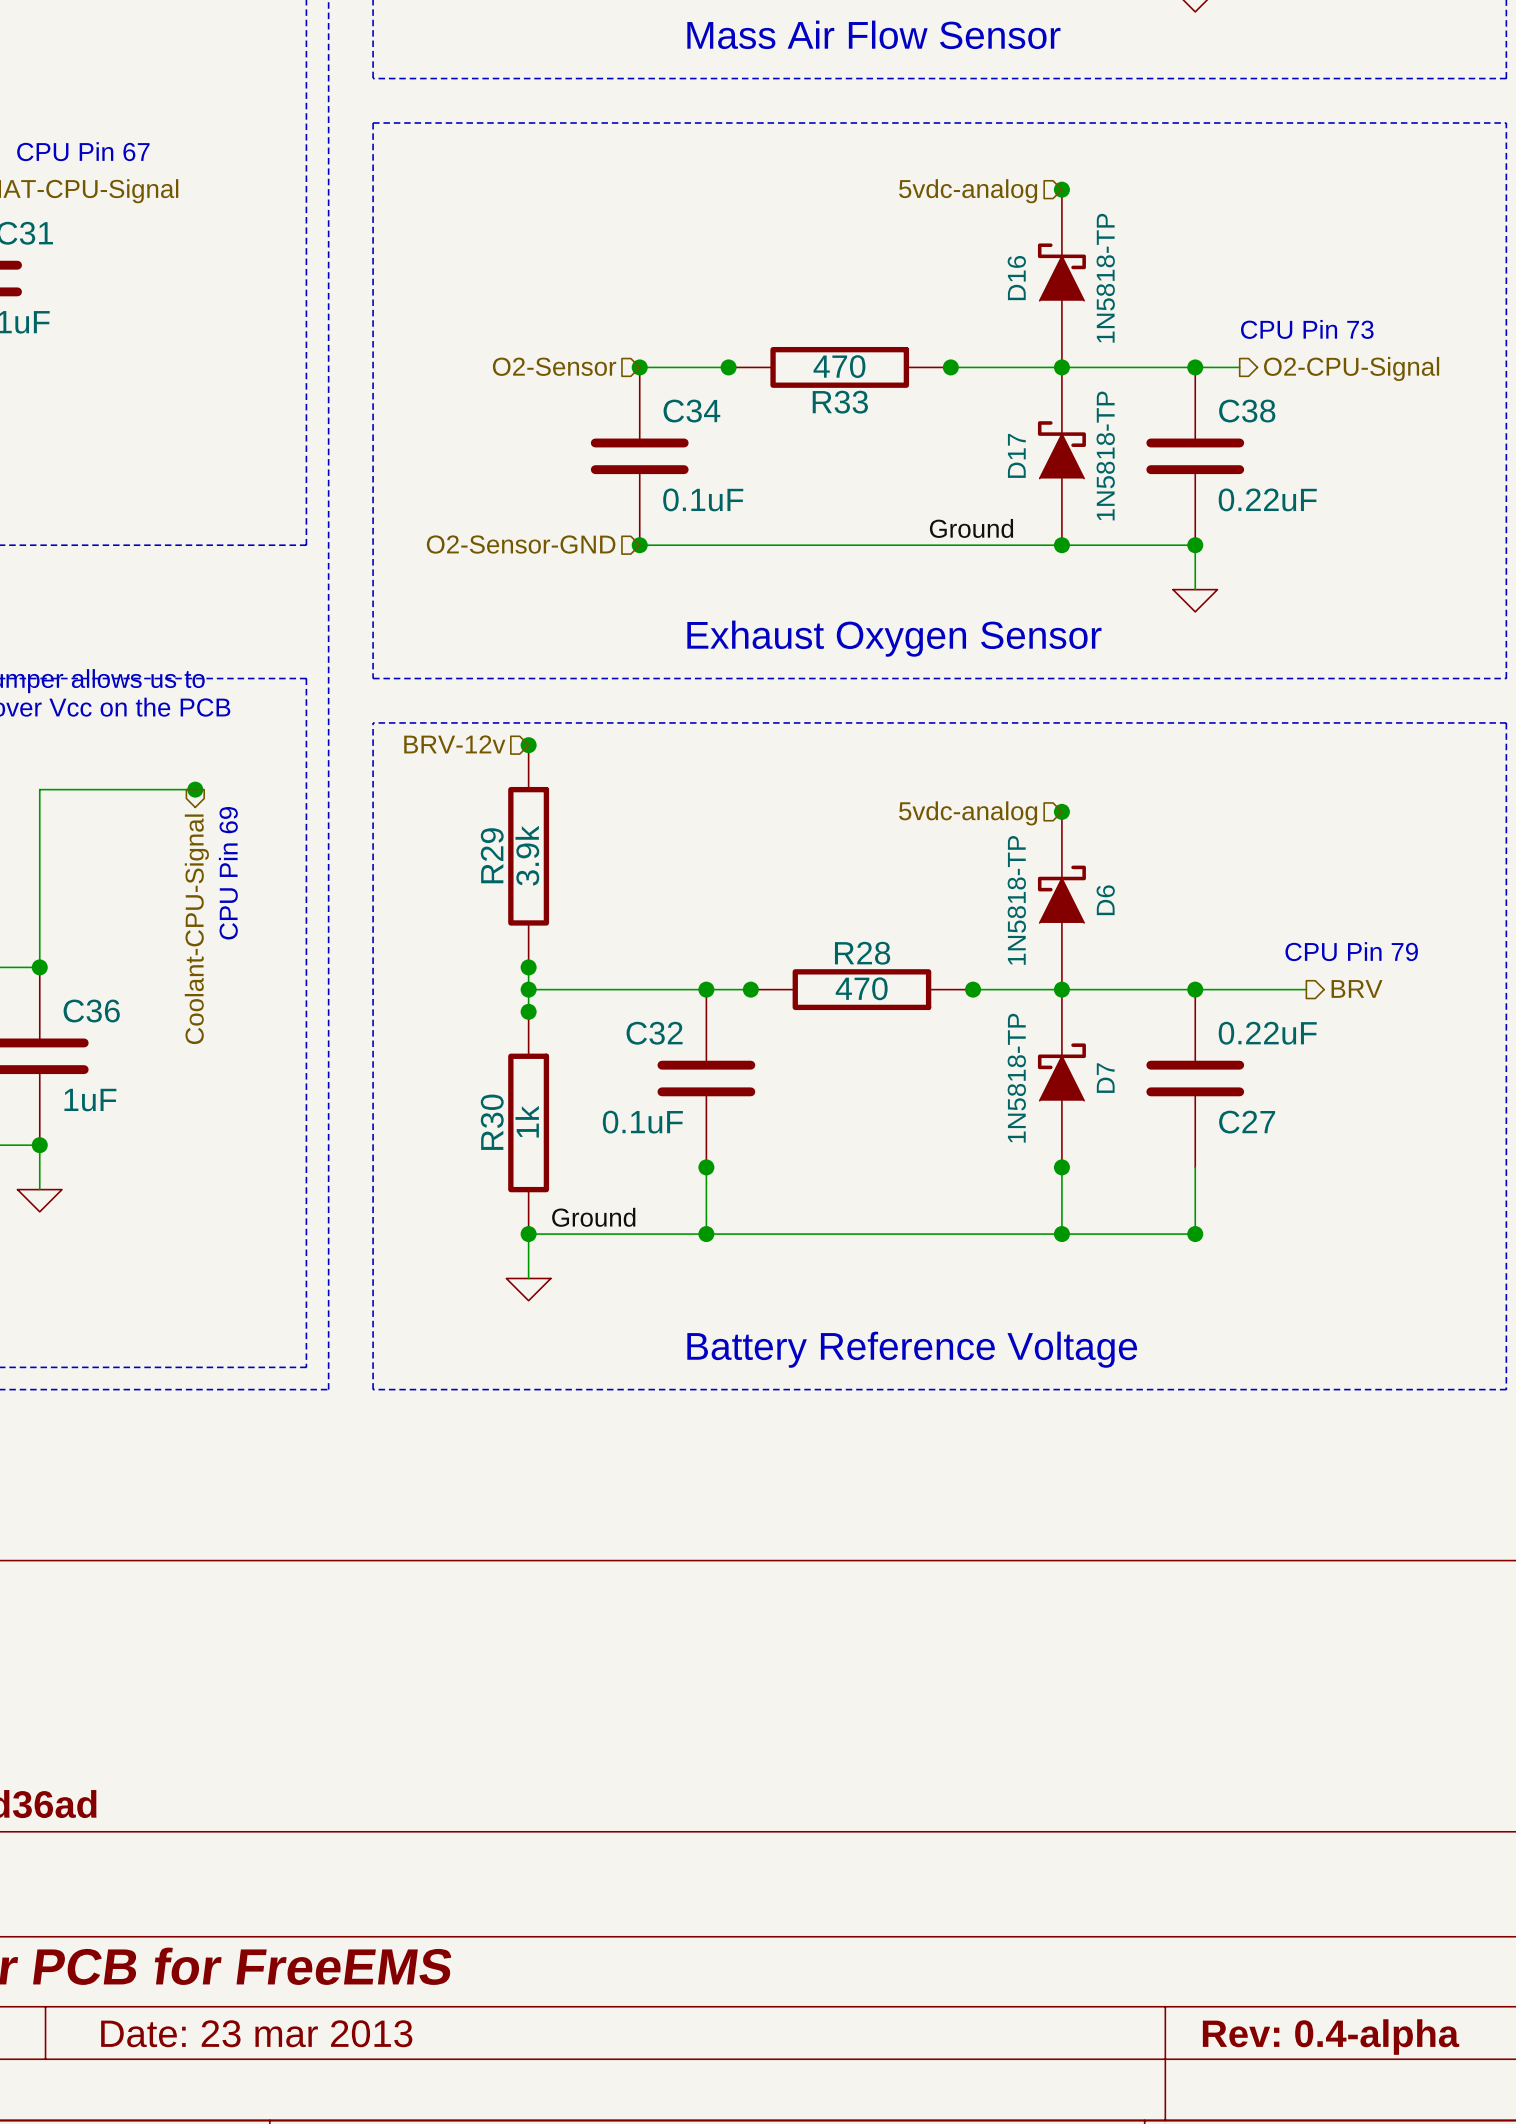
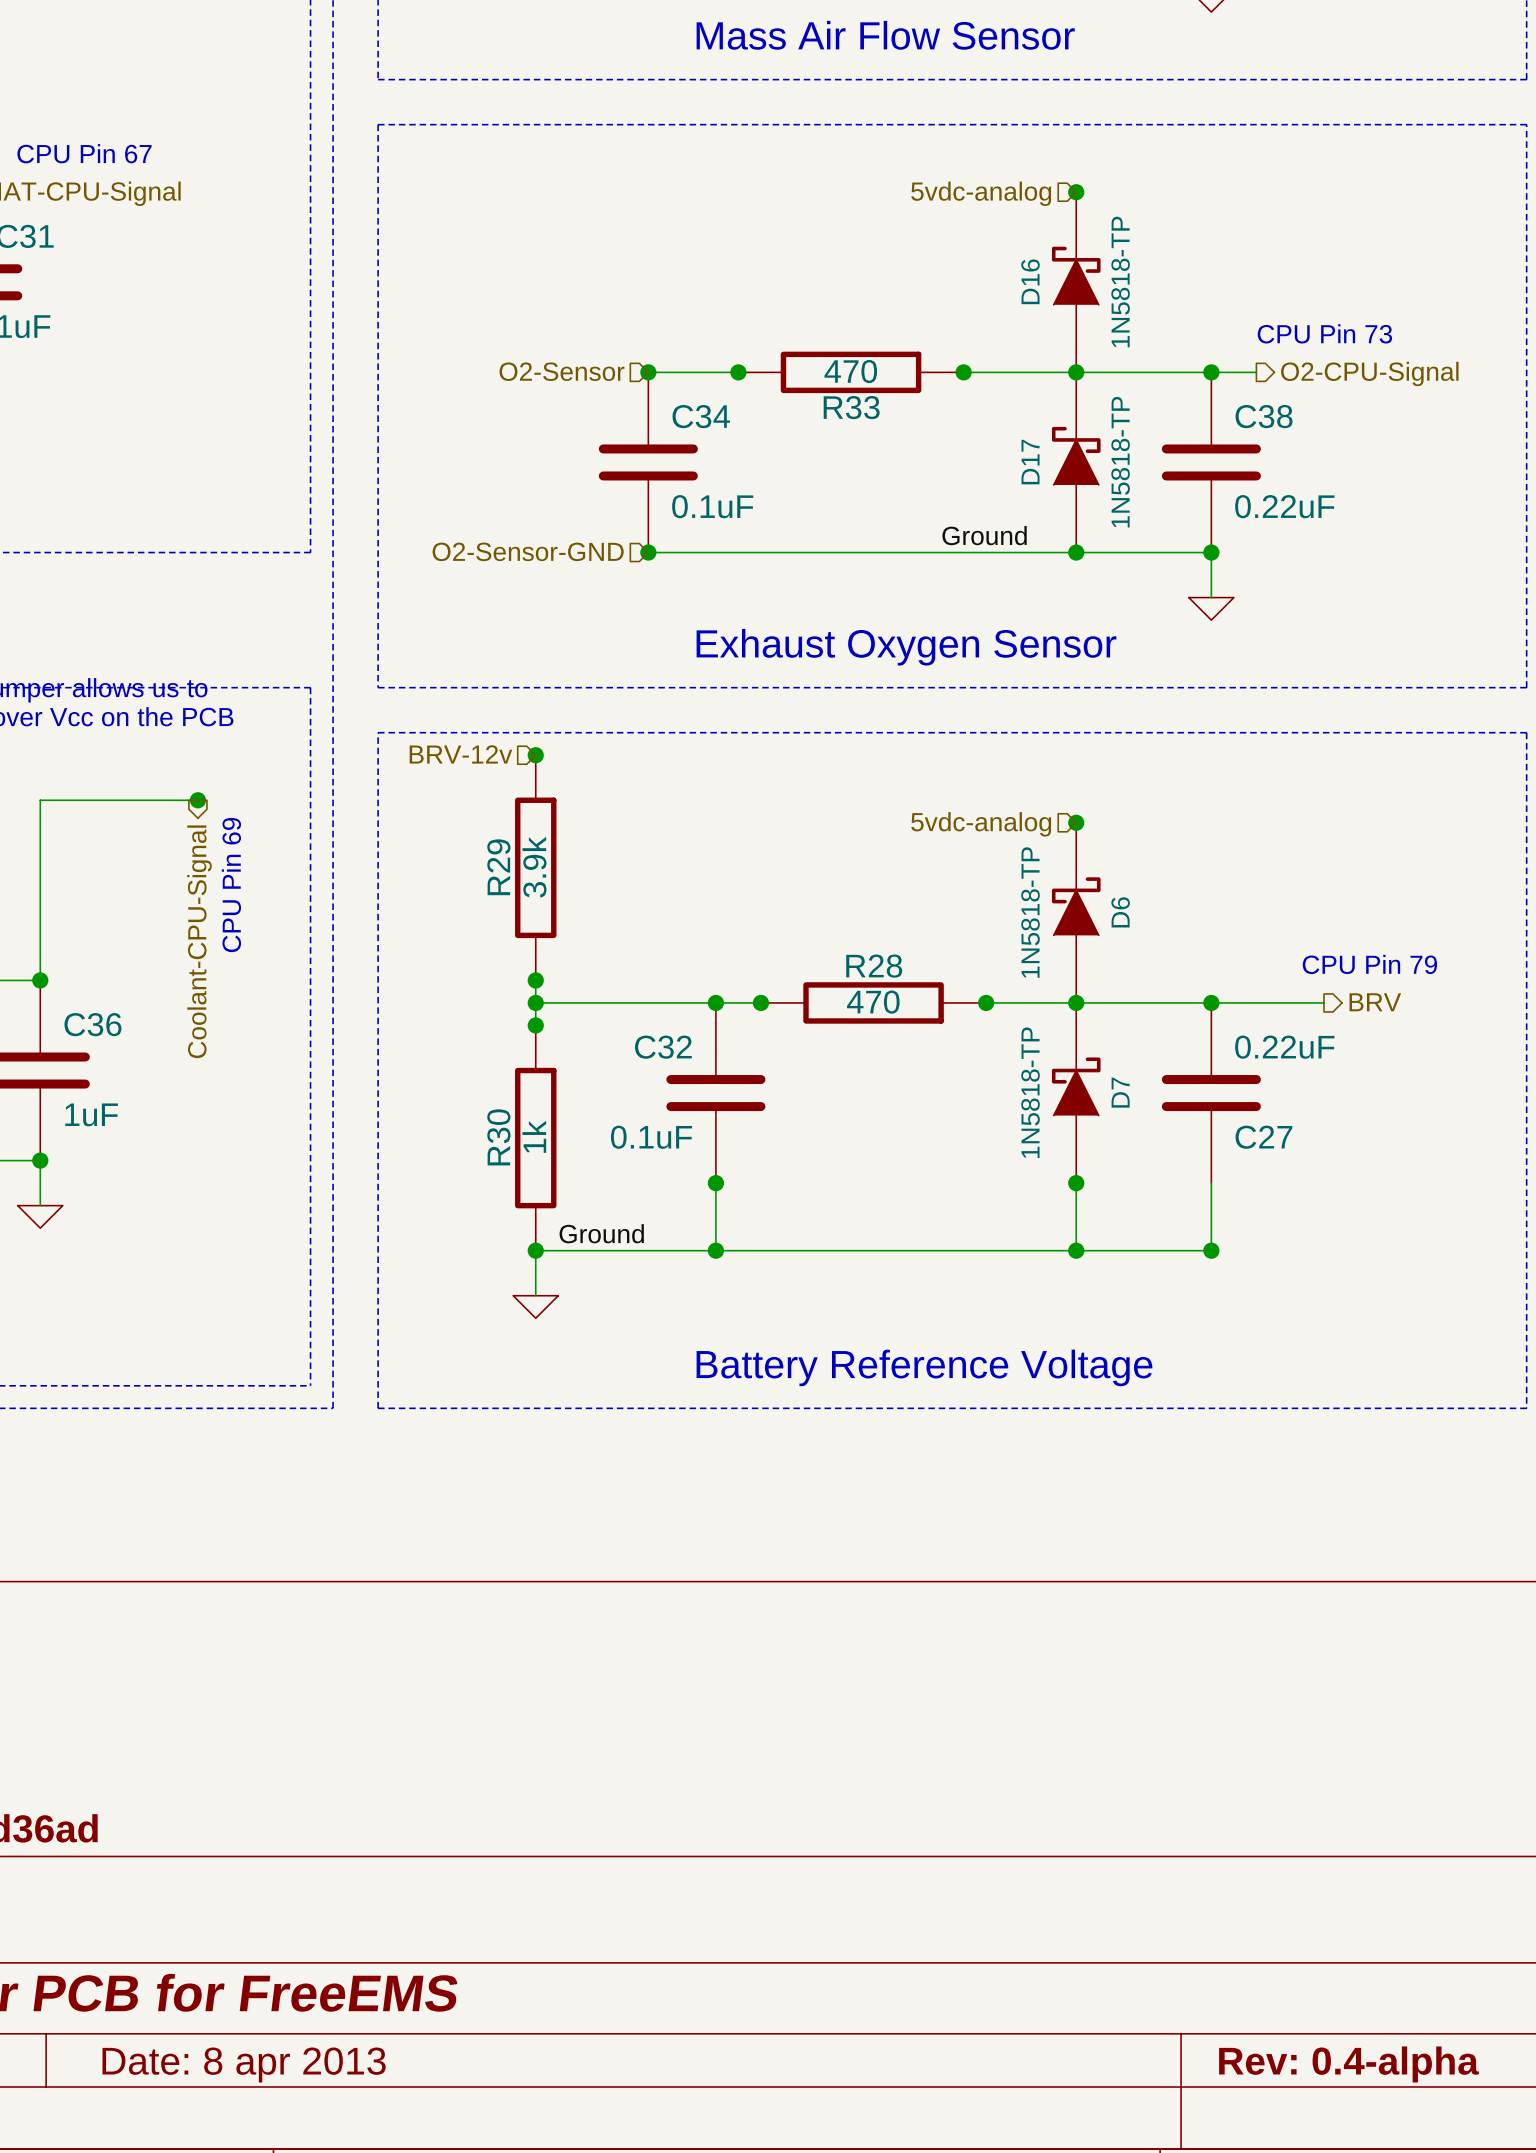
title block: Date: 23 mar 2013 (256, 2033) -> Date: 8 apr 2013 (244, 2064)

